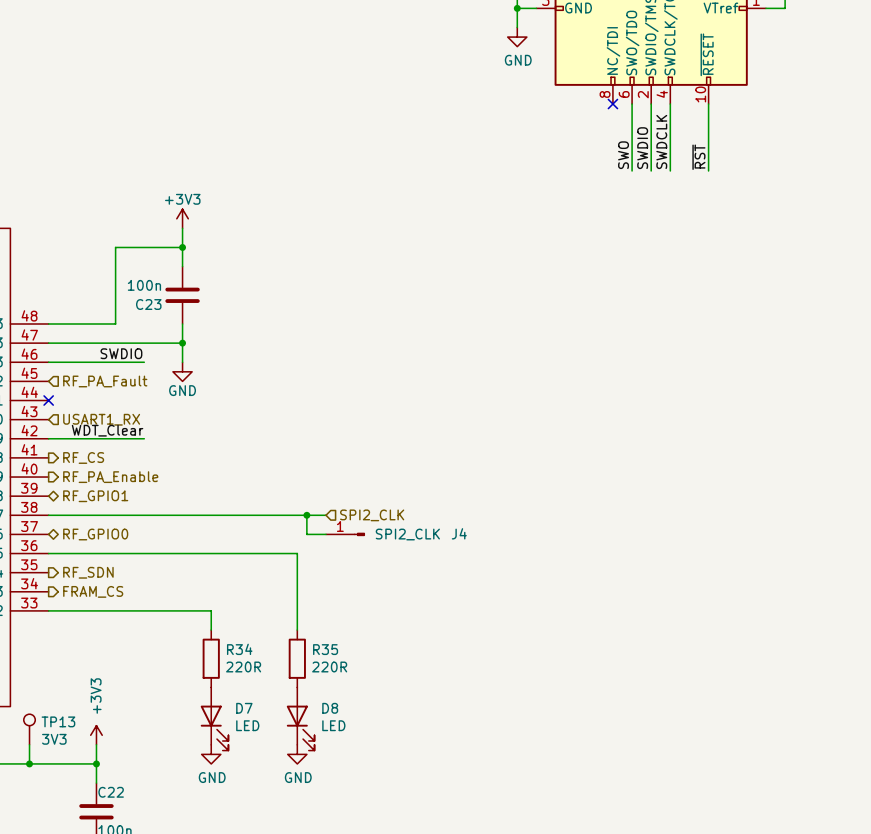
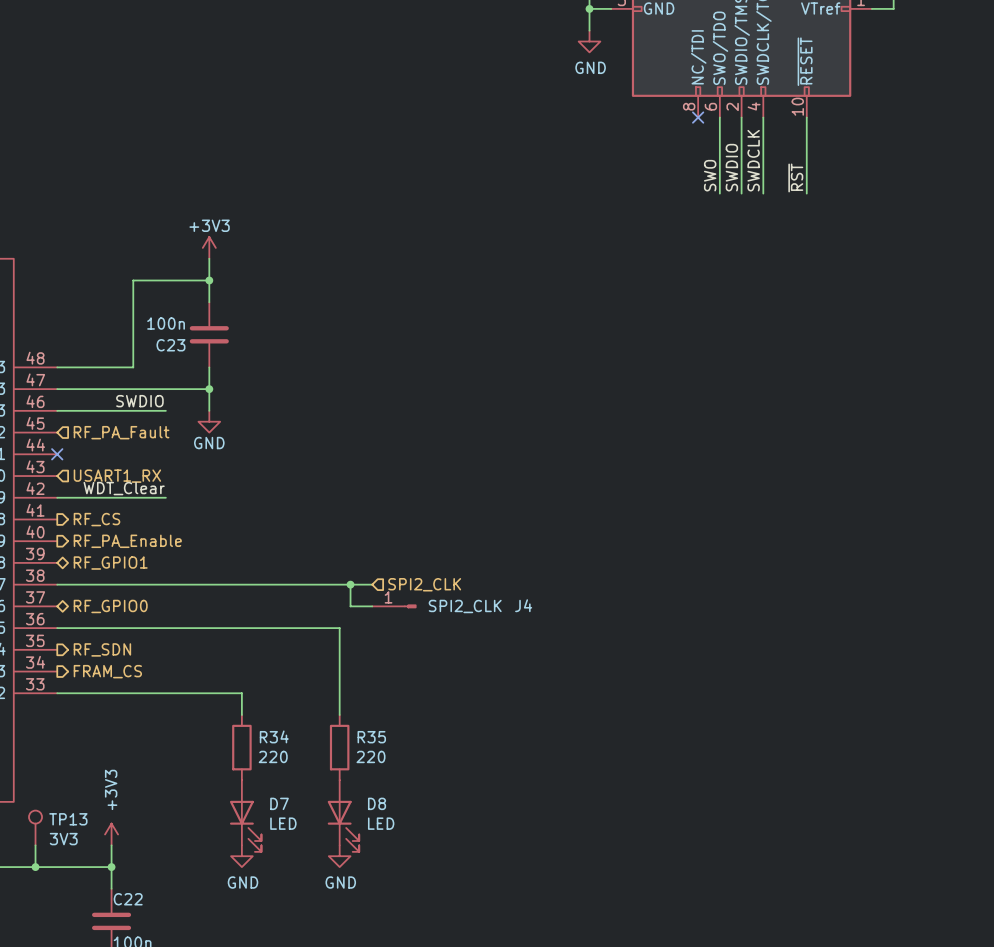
R34 value: 220R (243, 666) -> 220 (273, 756)
R35 value: 220R (329, 666) -> 220 (370, 756)

